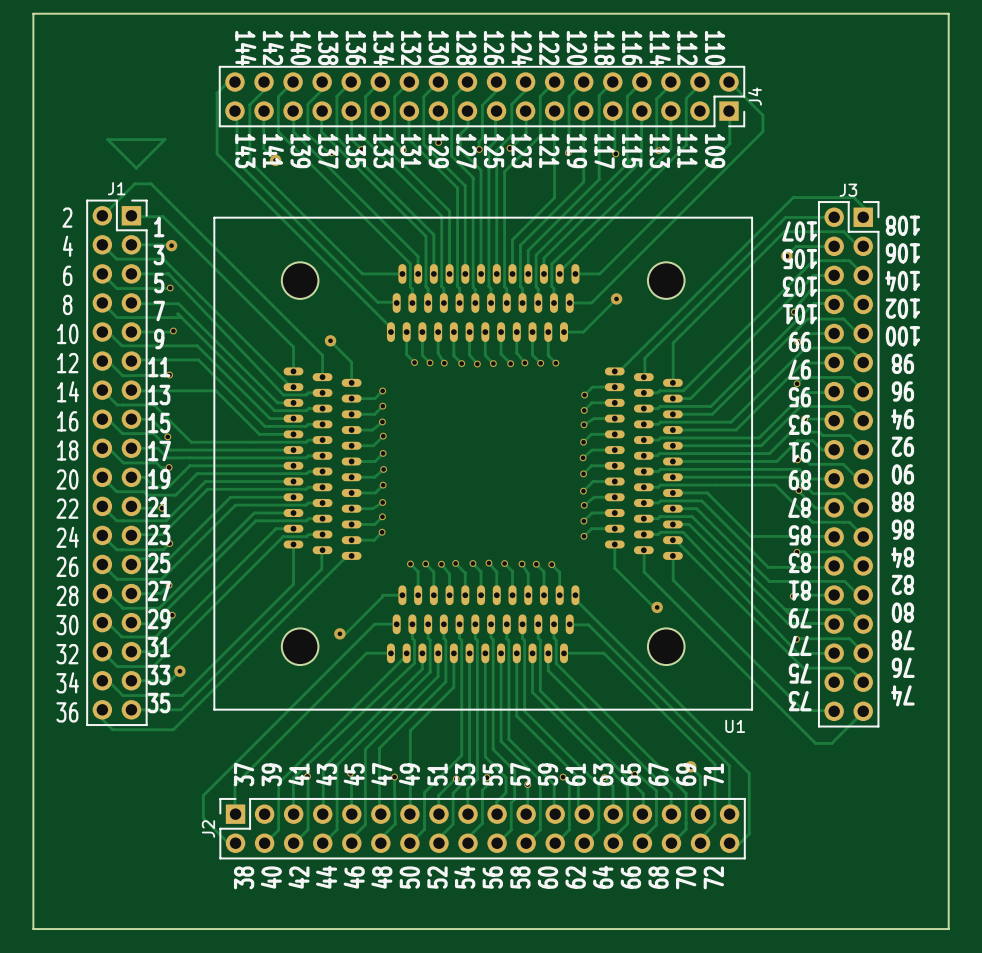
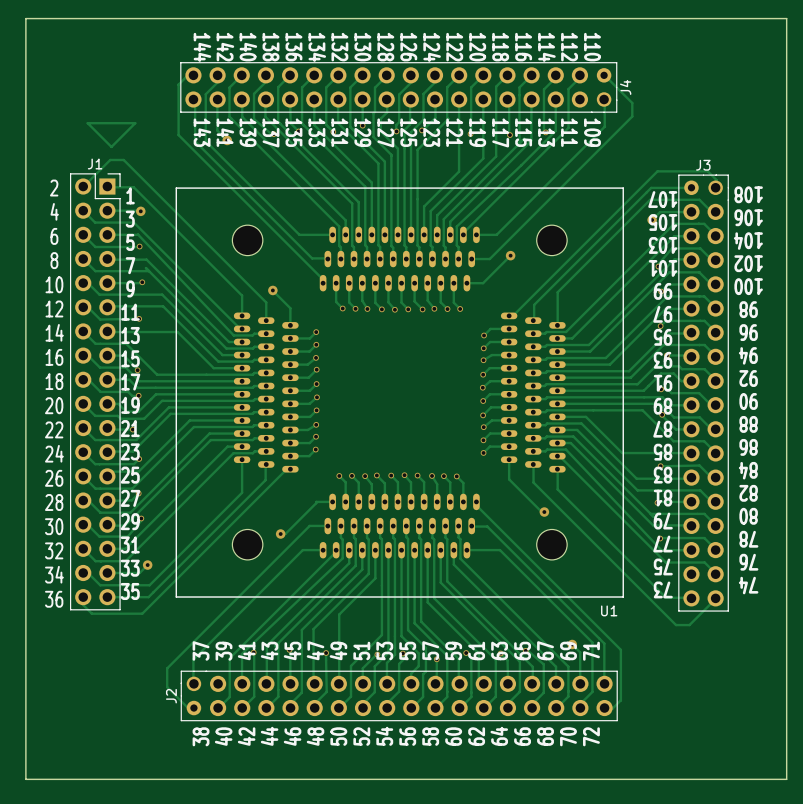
J4 footprint: [219, 66, 745, 127] -> [180, 62, 618, 113]
J3 footprint: [818, 201, 880, 728] -> [678, 174, 729, 612]
J2 footprint: [219, 798, 746, 860] -> [180, 670, 618, 722]

